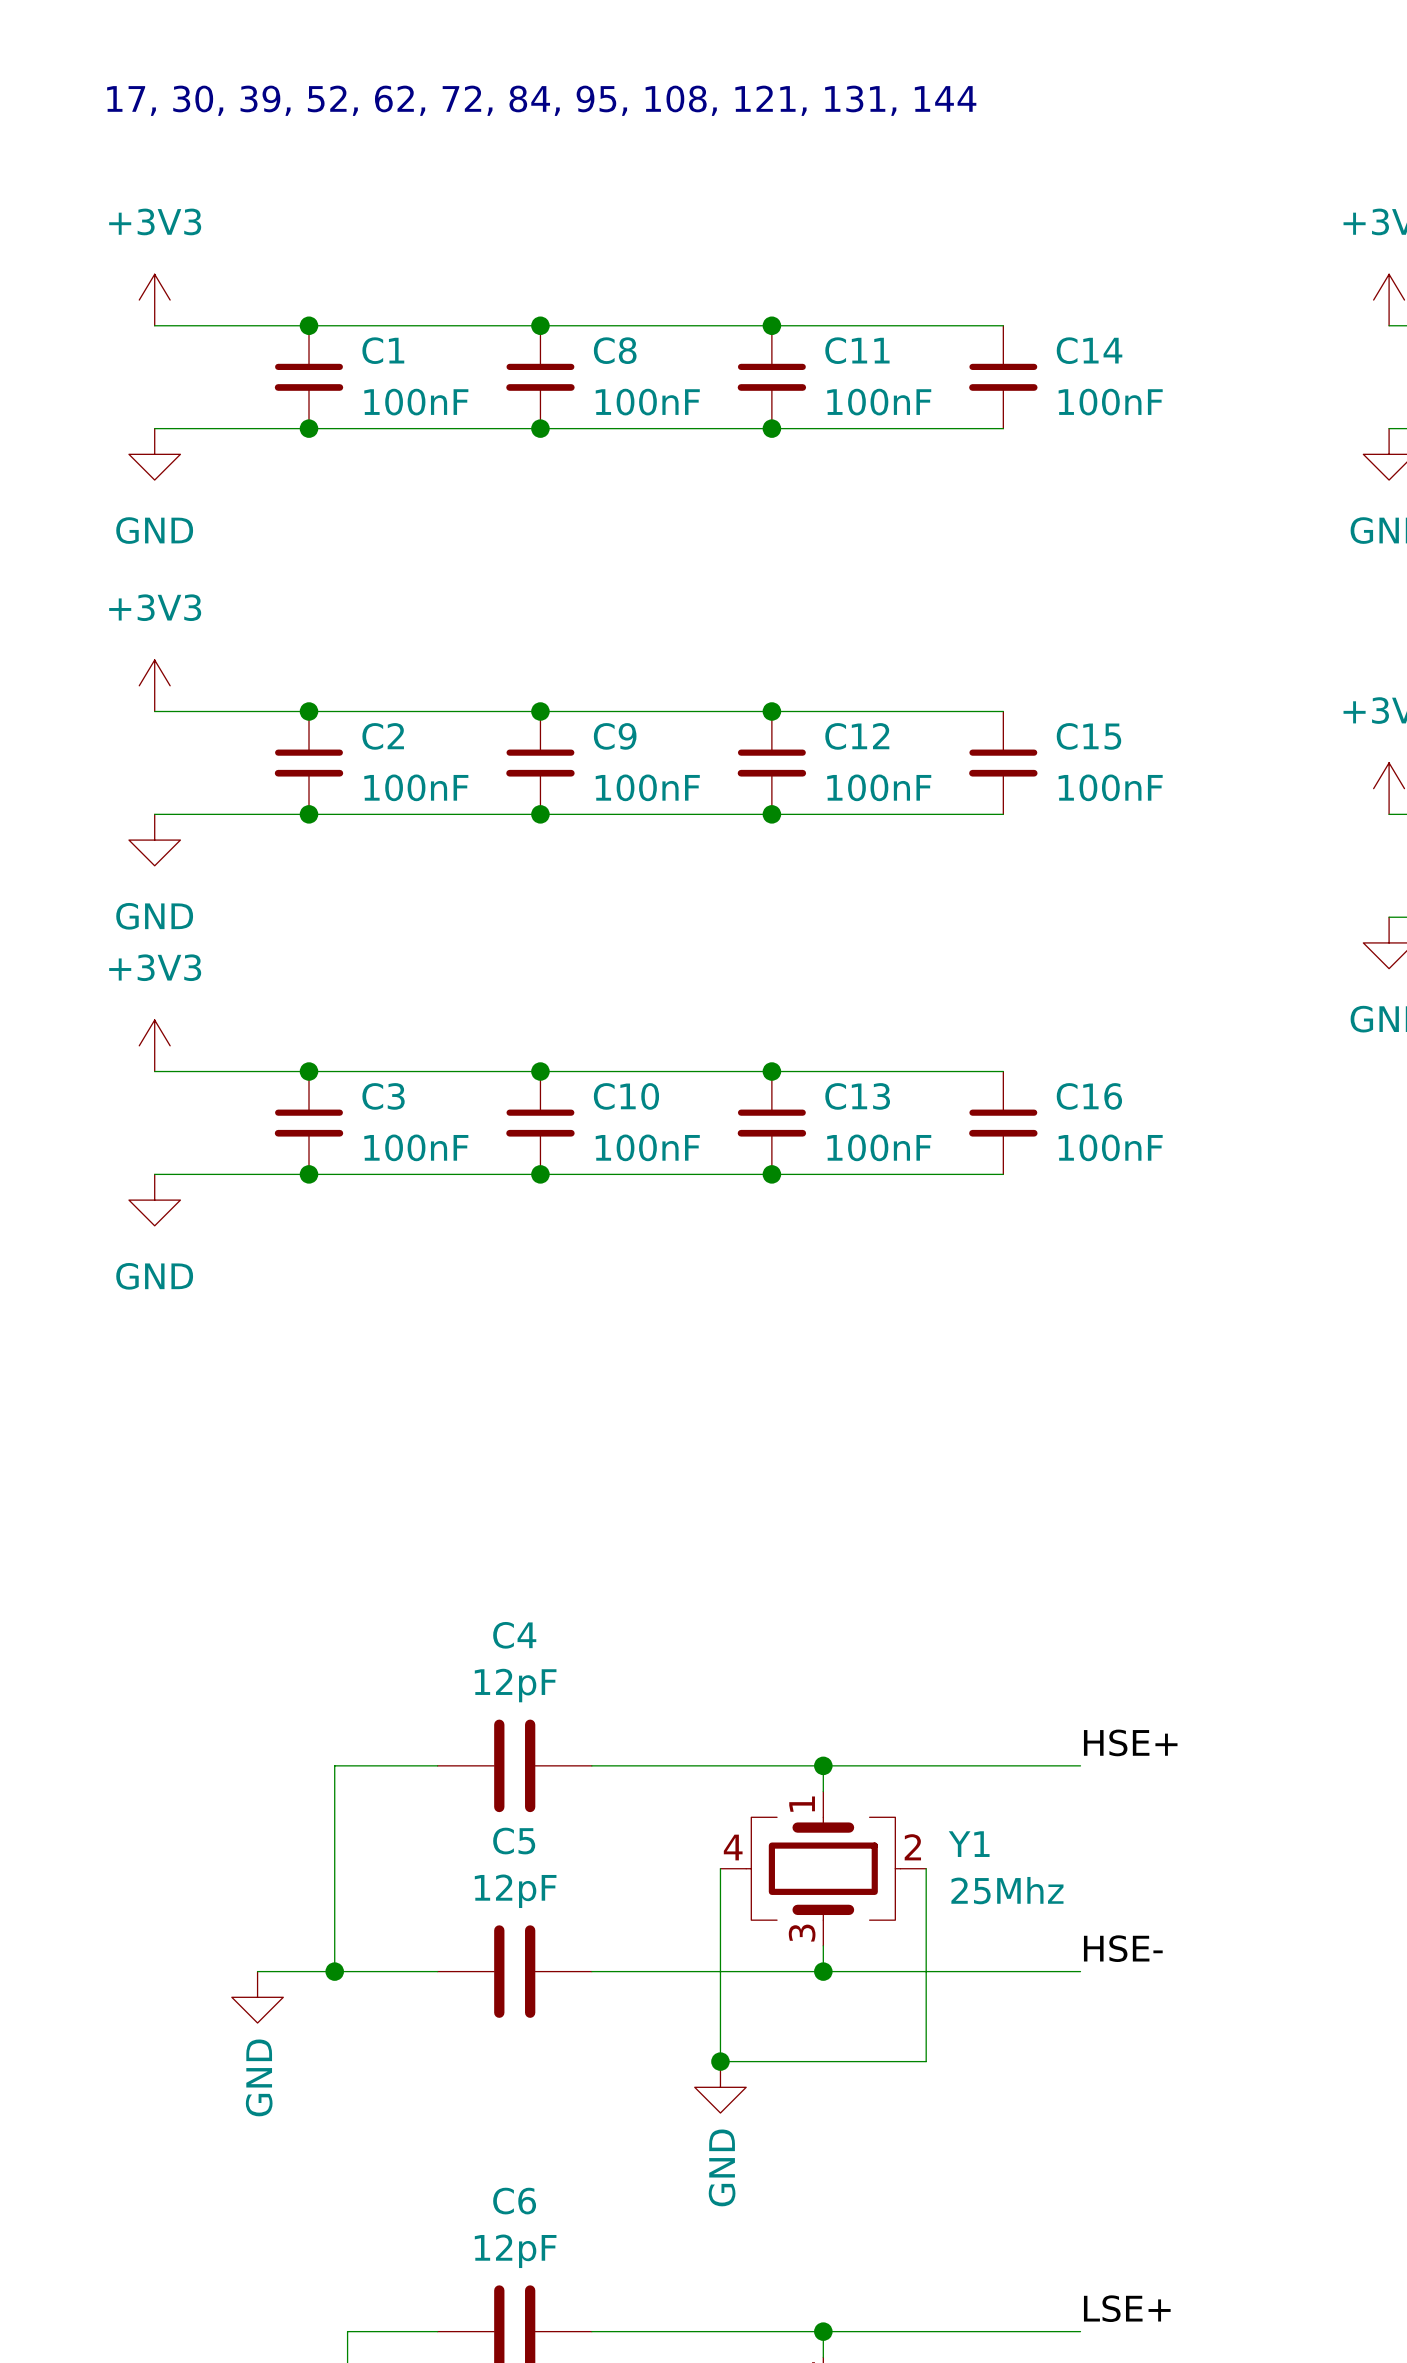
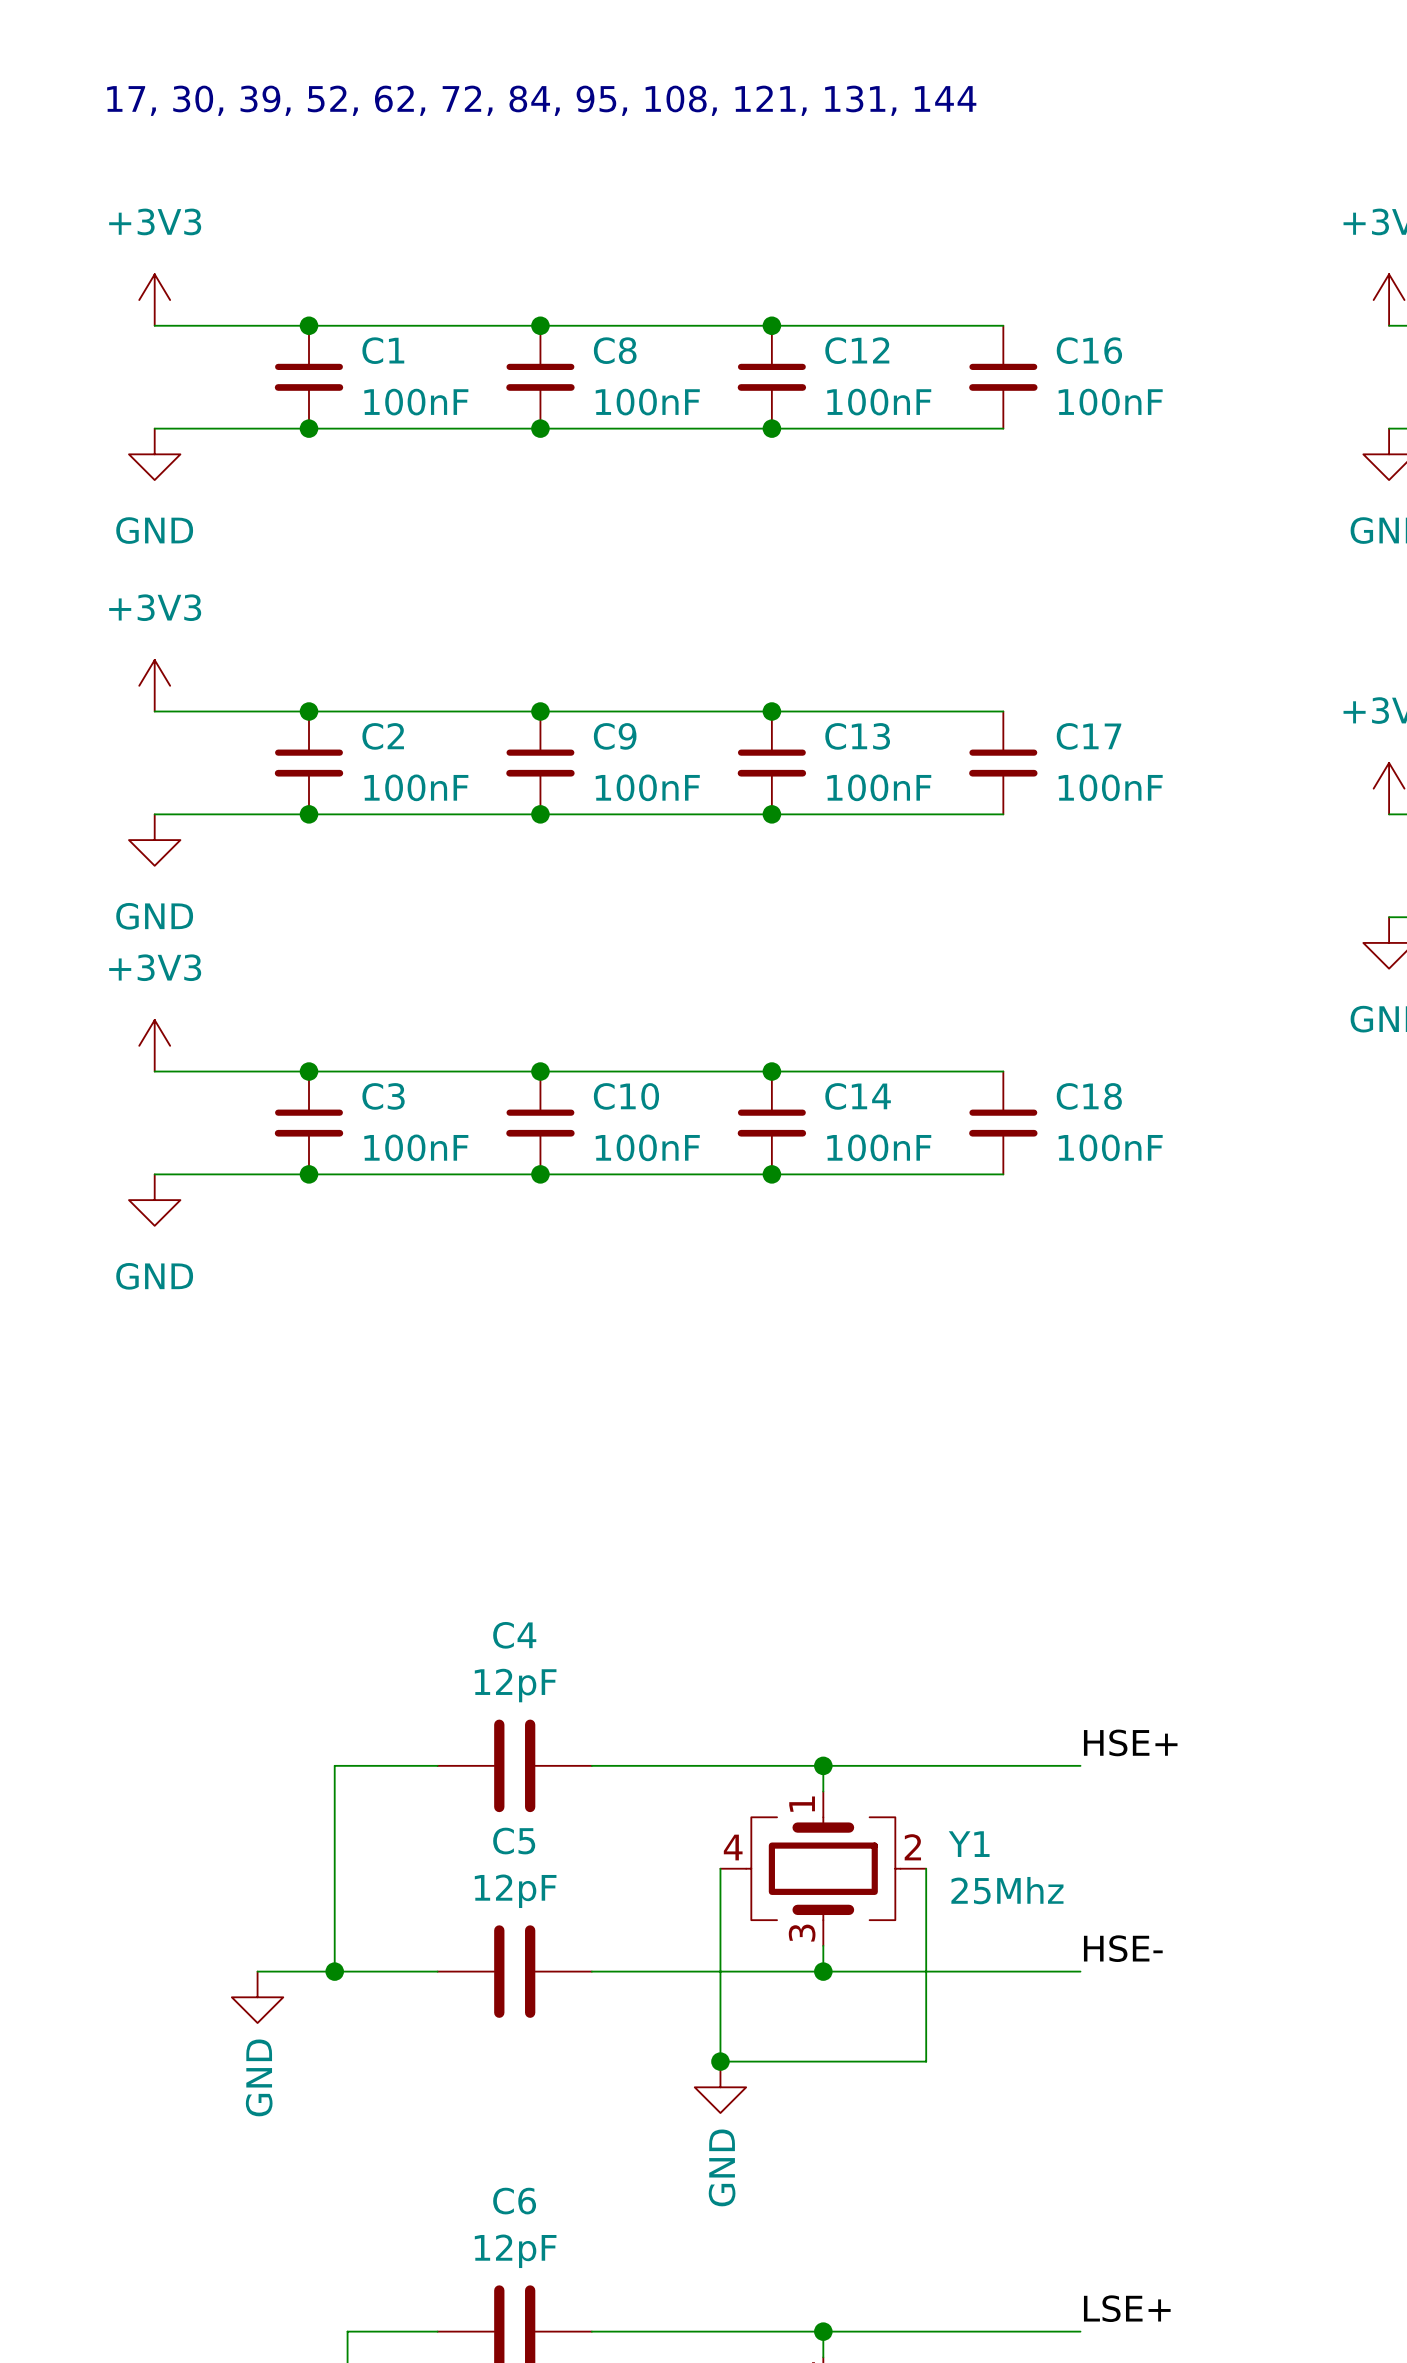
C11 name: C11 (857, 350) -> C12 (857, 350)
C14 name: C14 (1089, 350) -> C16 (1089, 350)
C12 name: C12 (857, 736) -> C13 (857, 736)
C15 name: C15 (1088, 736) -> C17 (1089, 736)
C13 name: C13 (857, 1096) -> C14 (858, 1096)
C16 name: C16 (1089, 1096) -> C18 (1089, 1096)

